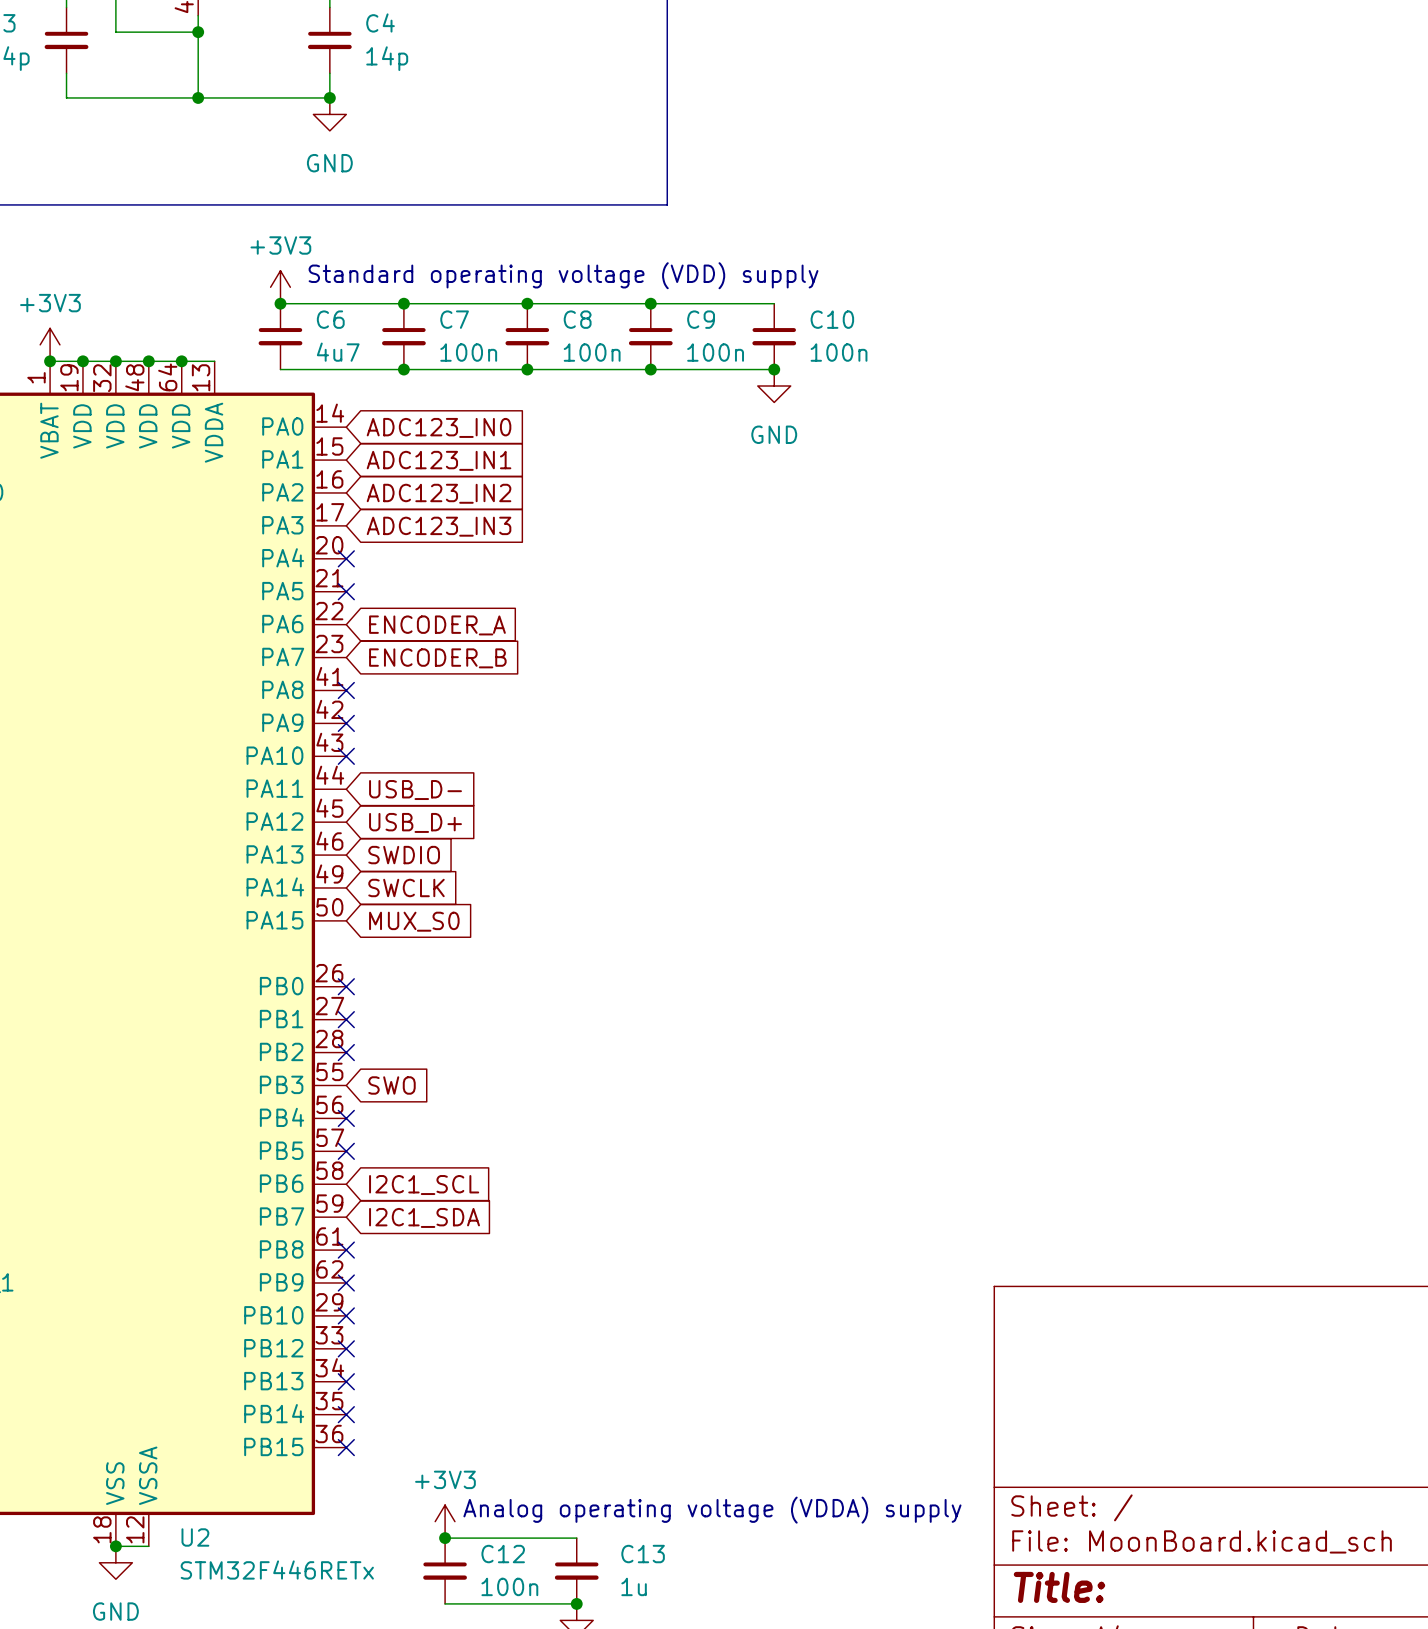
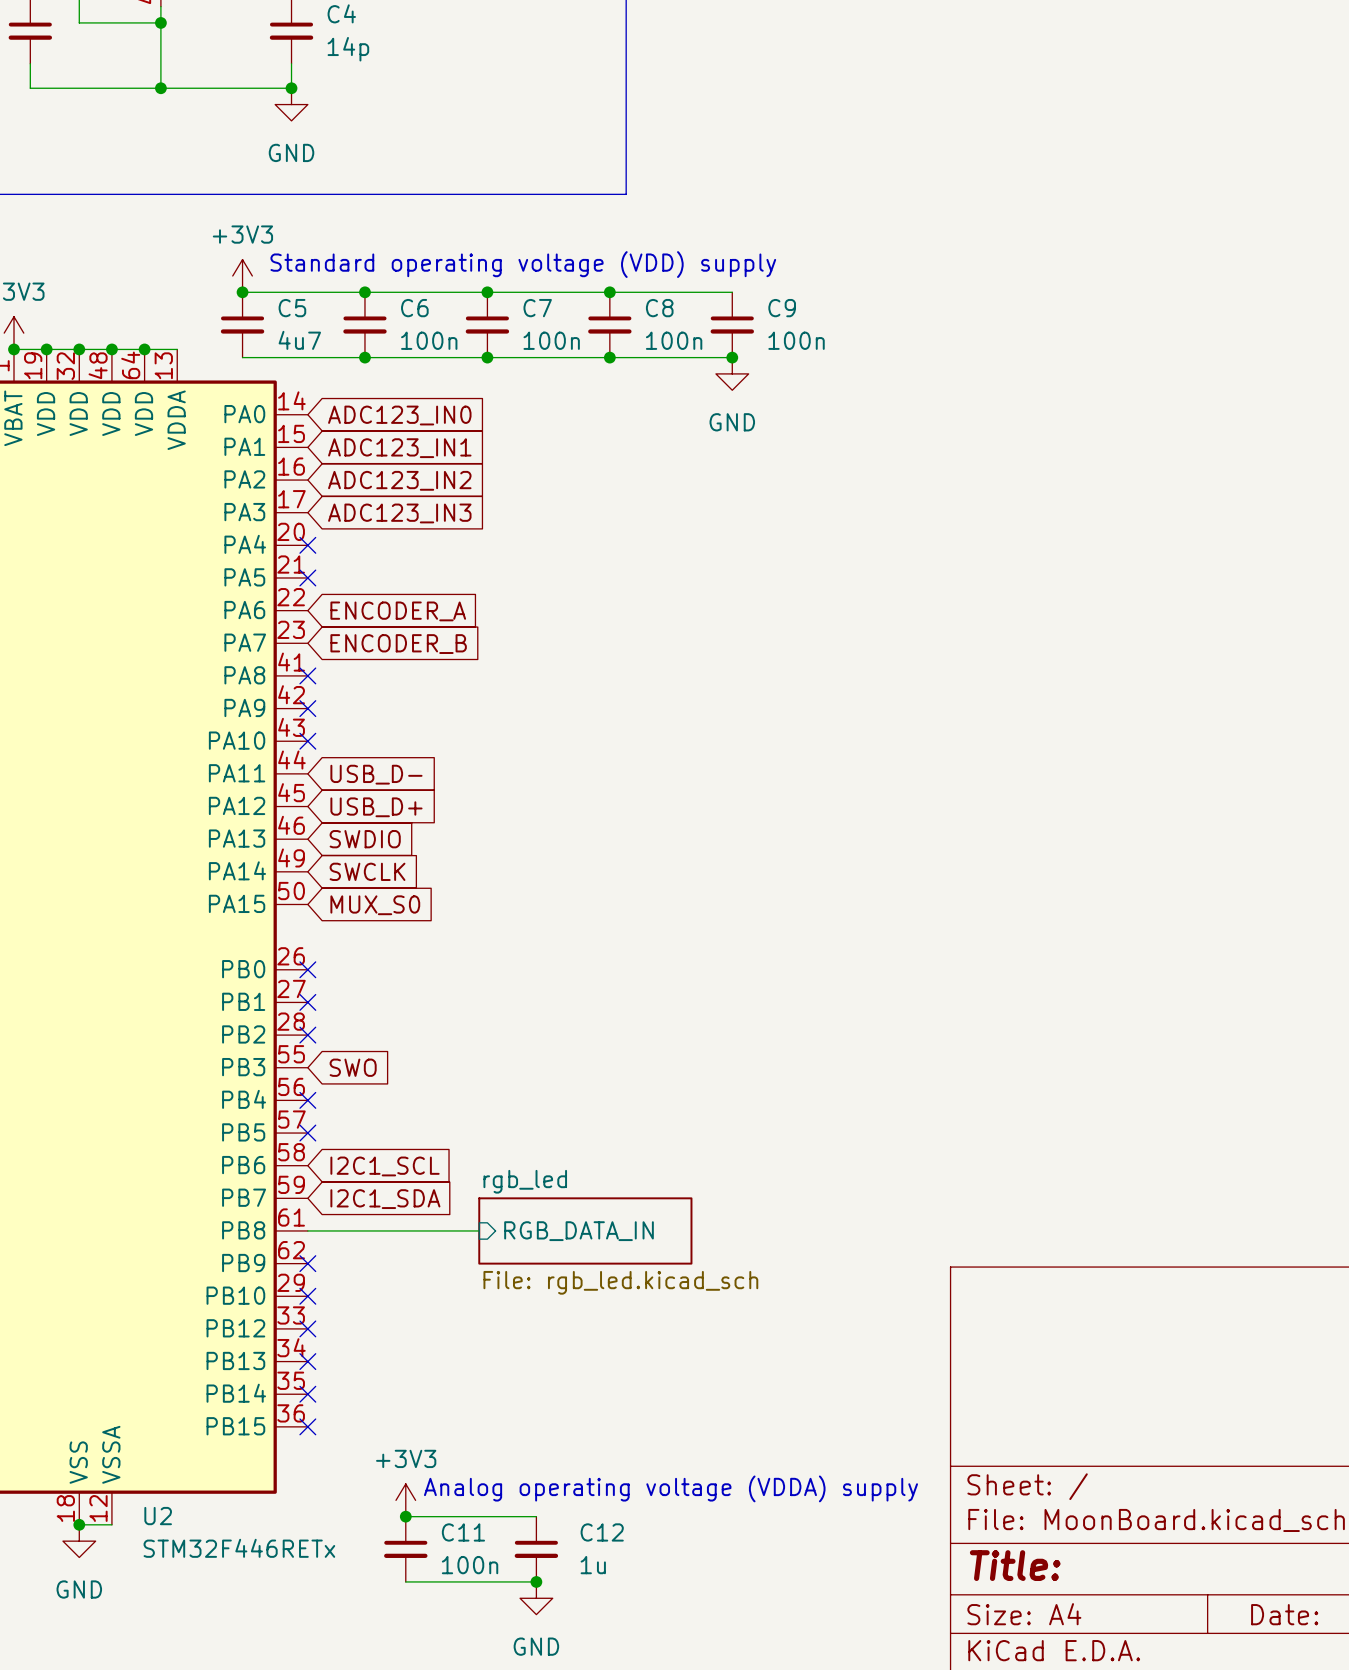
C6 name: C6 (330, 319) -> C5 (292, 308)
C7 name: C7 (454, 319) -> C6 (414, 308)
C8 name: C8 (577, 319) -> C7 (537, 308)
C9 name: C9 (701, 319) -> C8 (659, 308)
C10 name: C10 (832, 319) -> C9 (782, 308)
wire: none -> (307, 1230) (479, 1230)
no-connect mark: (346, 1250) -> none
sheet pin: none -> RGB_DATA_IN (579, 1231)
sheet rgb_led: none -> File: rgb_led.kicad_sch (585, 1230)
C12 name: C12 (503, 1554) -> C11 (463, 1532)
C13 name: C13 (643, 1554) -> C12 (602, 1532)

